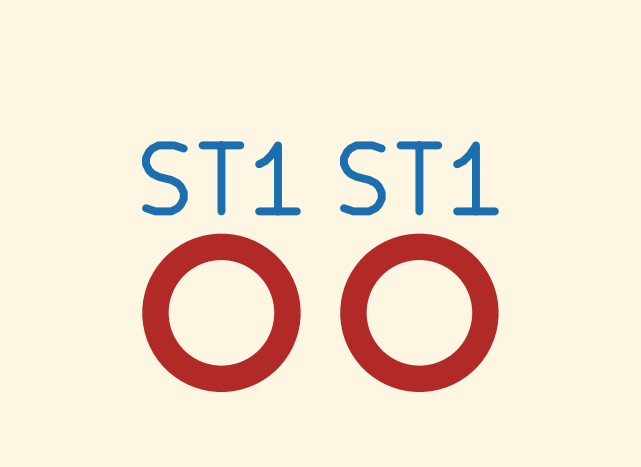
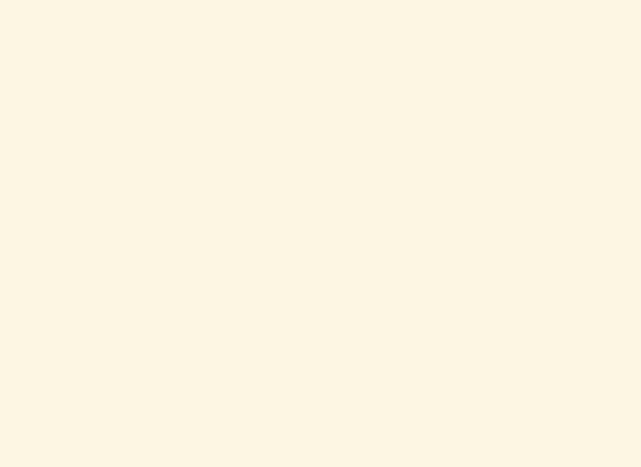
ST1: (221, 312) -> none
ST1: (419, 312) -> none

